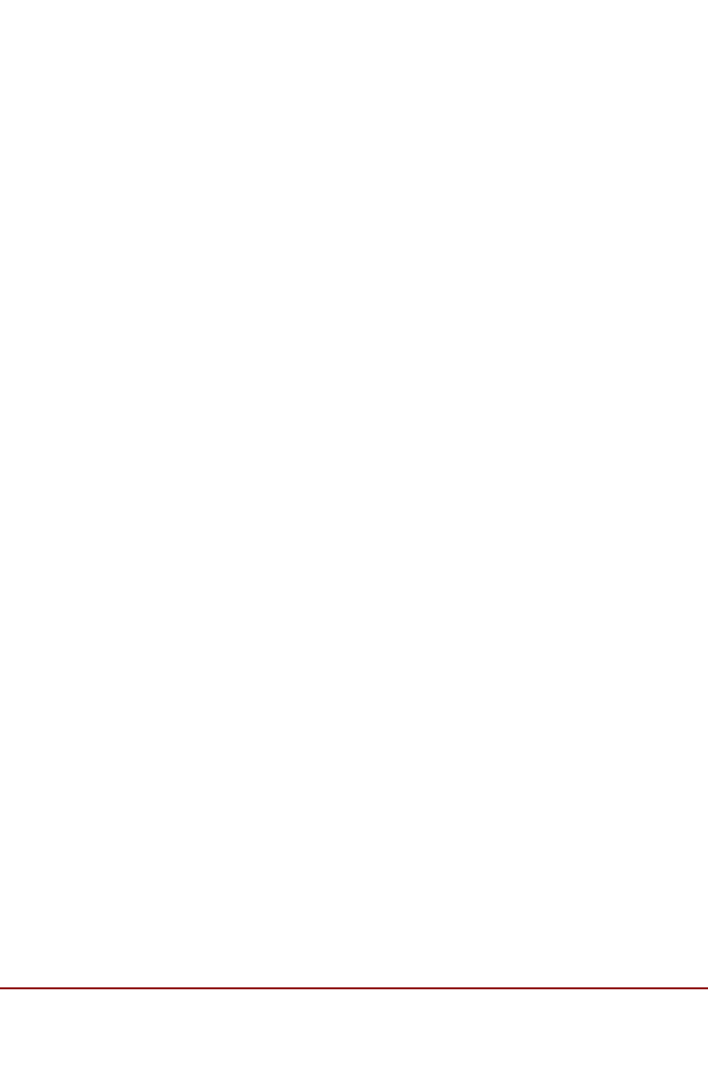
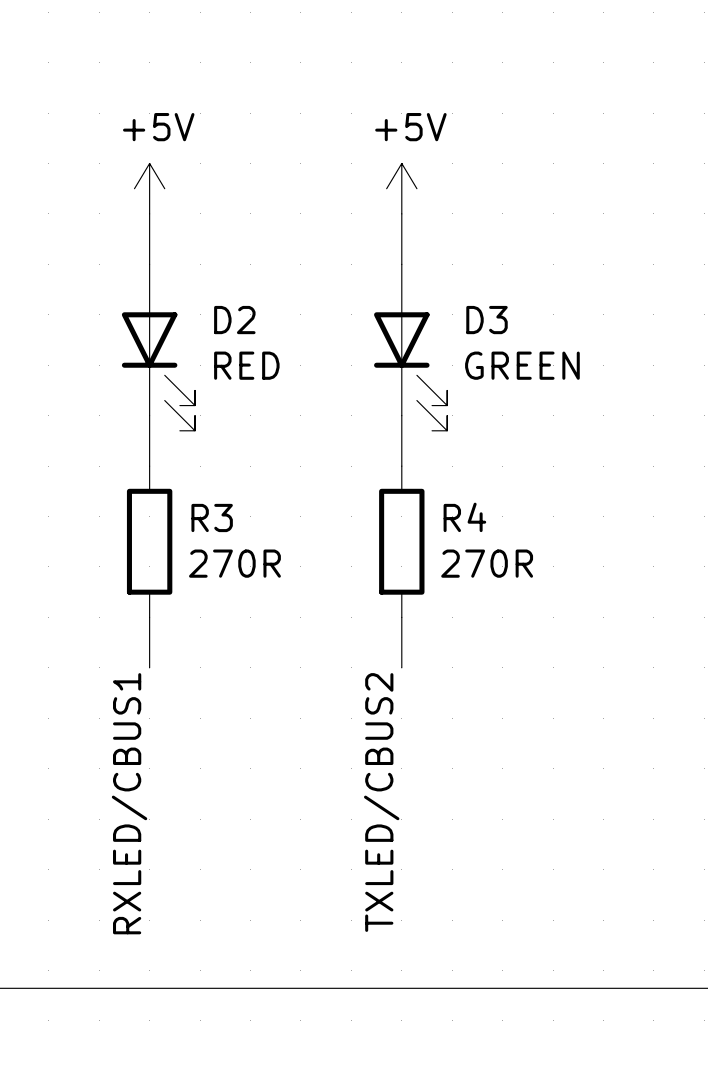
power symbol: none -> +5V (149, 188)
power symbol: none -> +5V (401, 188)
wire: none -> (149, 213) (149, 264)
wire: none -> (401, 213) (401, 264)
D2: none -> RED (158, 347)
D3: none -> GREEN (410, 347)
wire: none -> (149, 415) (149, 466)
wire: none -> (401, 415) (401, 466)
R3: none -> 270R (149, 541)
R4: none -> 270R (401, 541)
wire: none -> (149, 617) (149, 667)
wire: none -> (401, 617) (401, 667)
label: none -> TXLED/CBUS2 (381, 802)
label: none -> RXLED/CBUS1 (129, 803)

